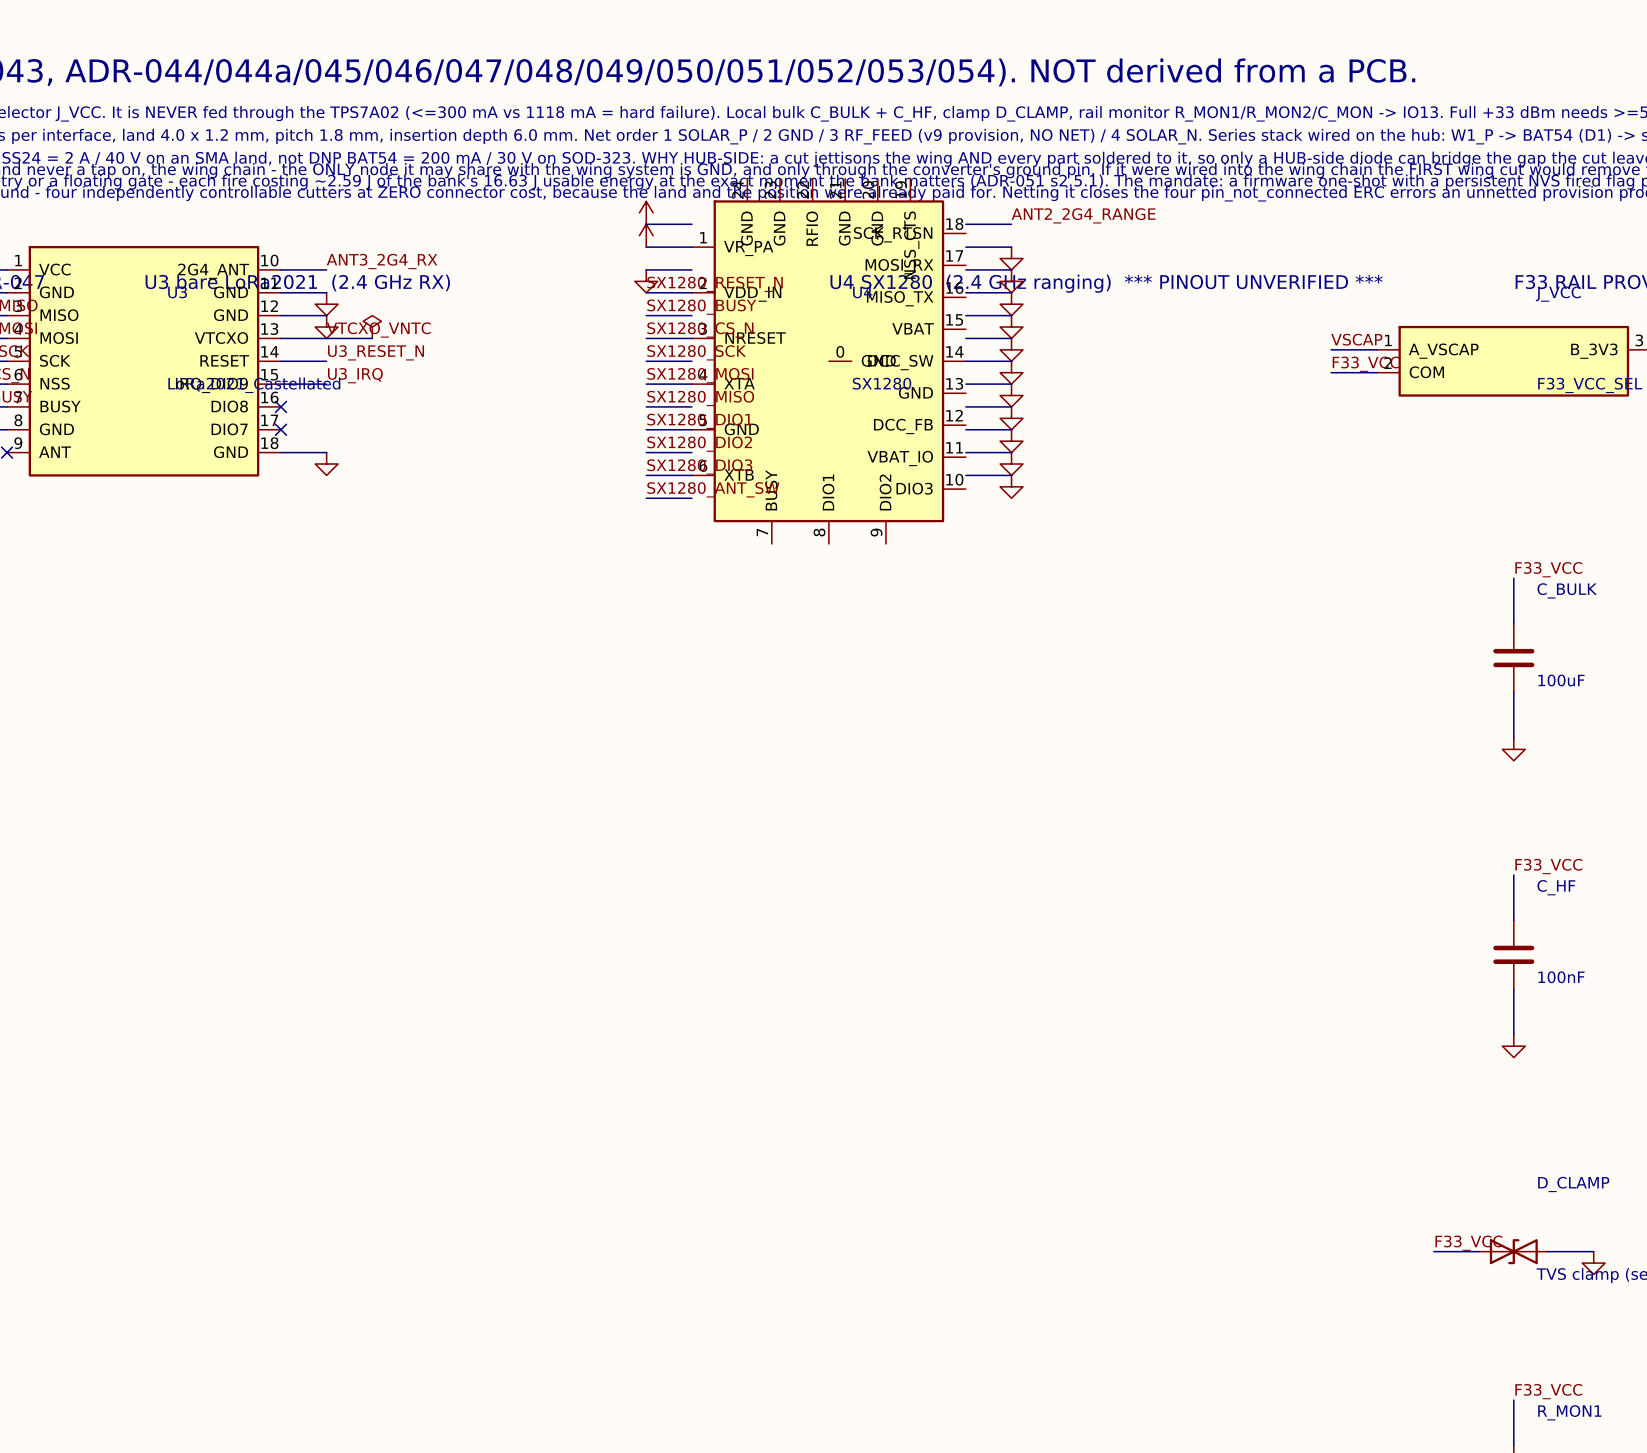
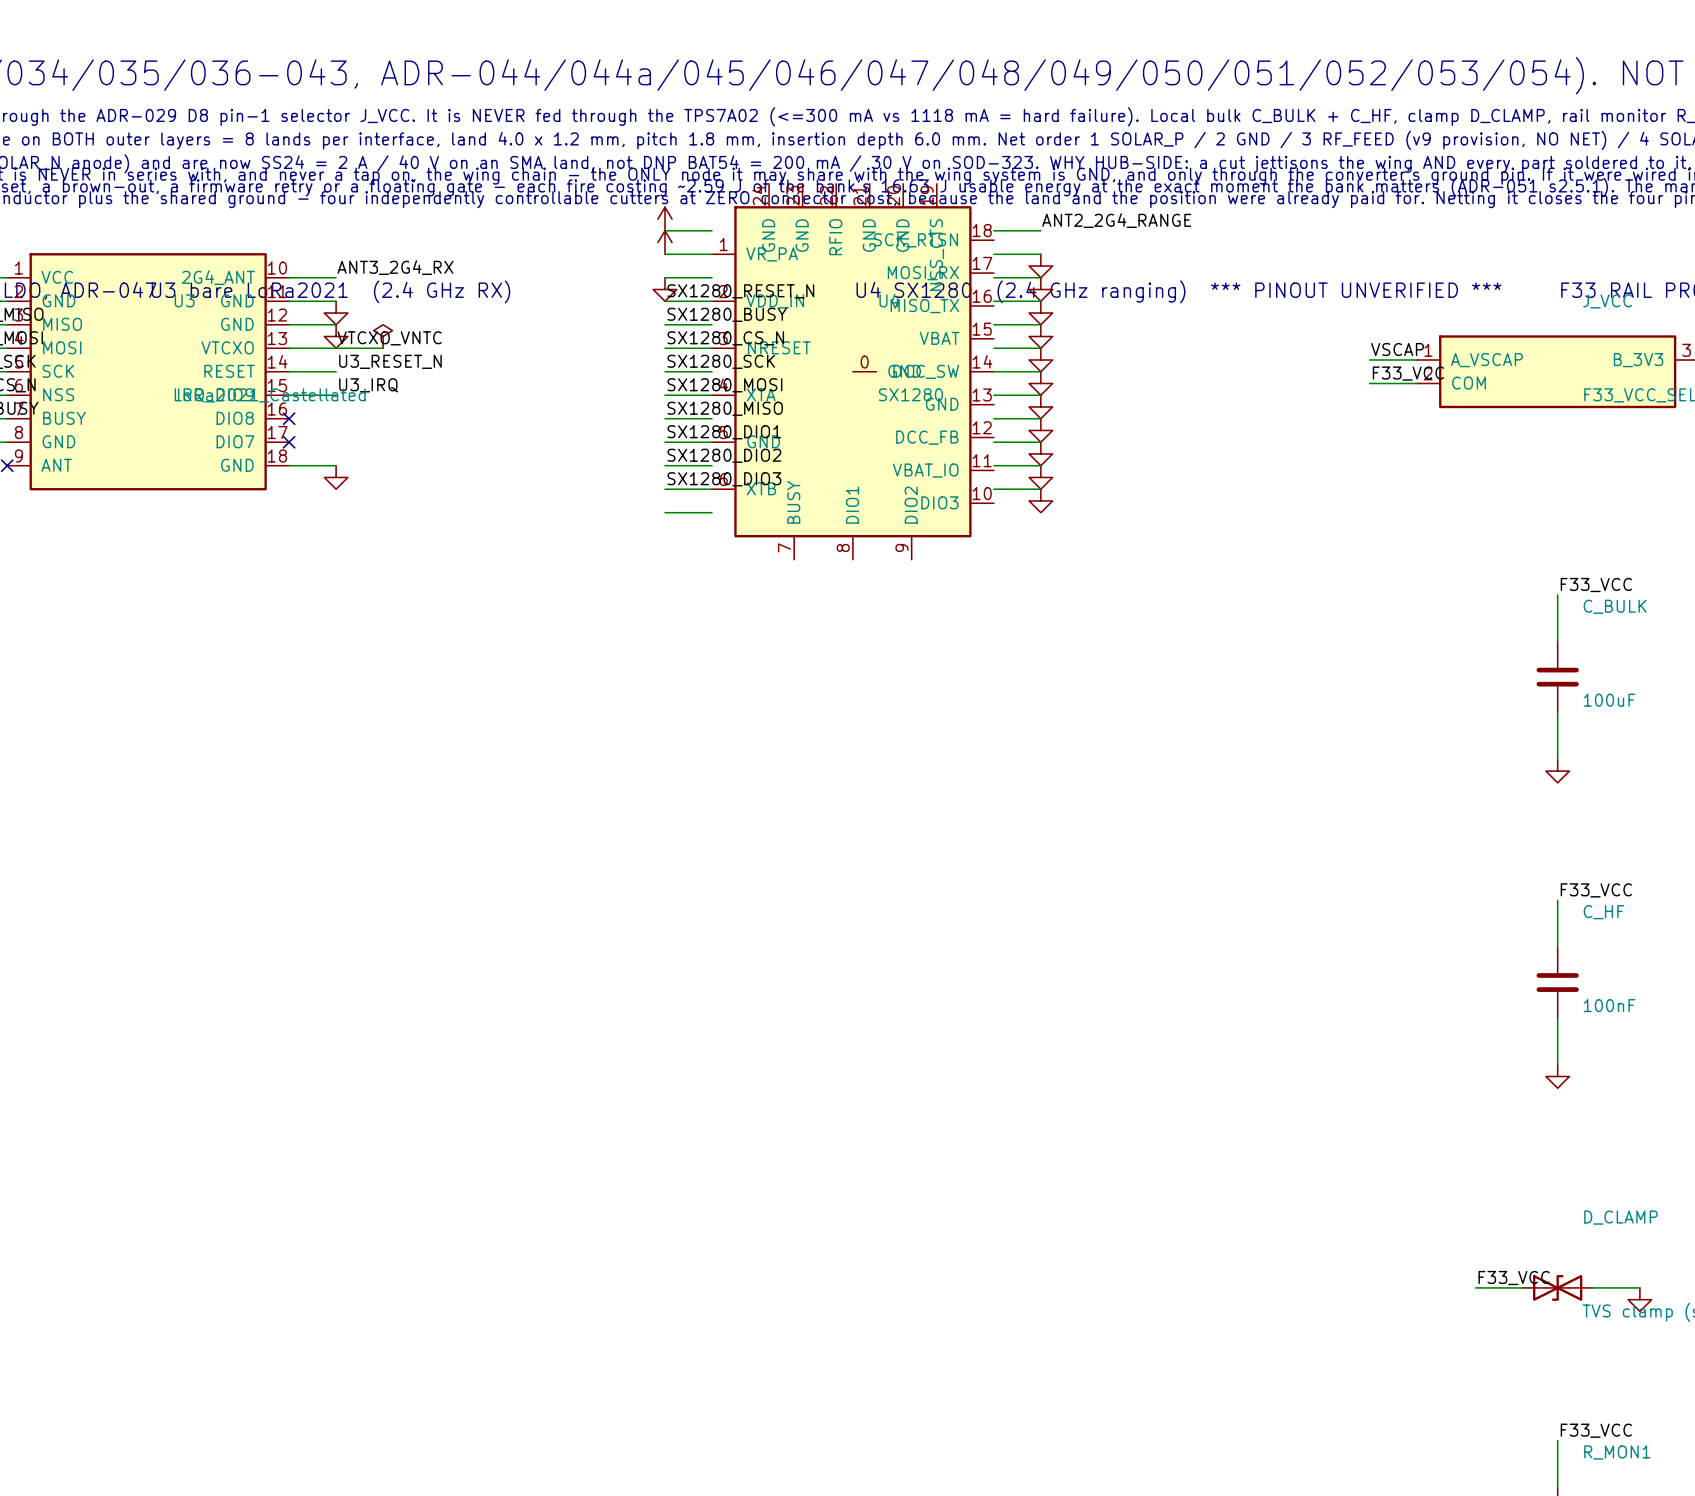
label: SX1280_ANT_SW (713, 489) -> none

